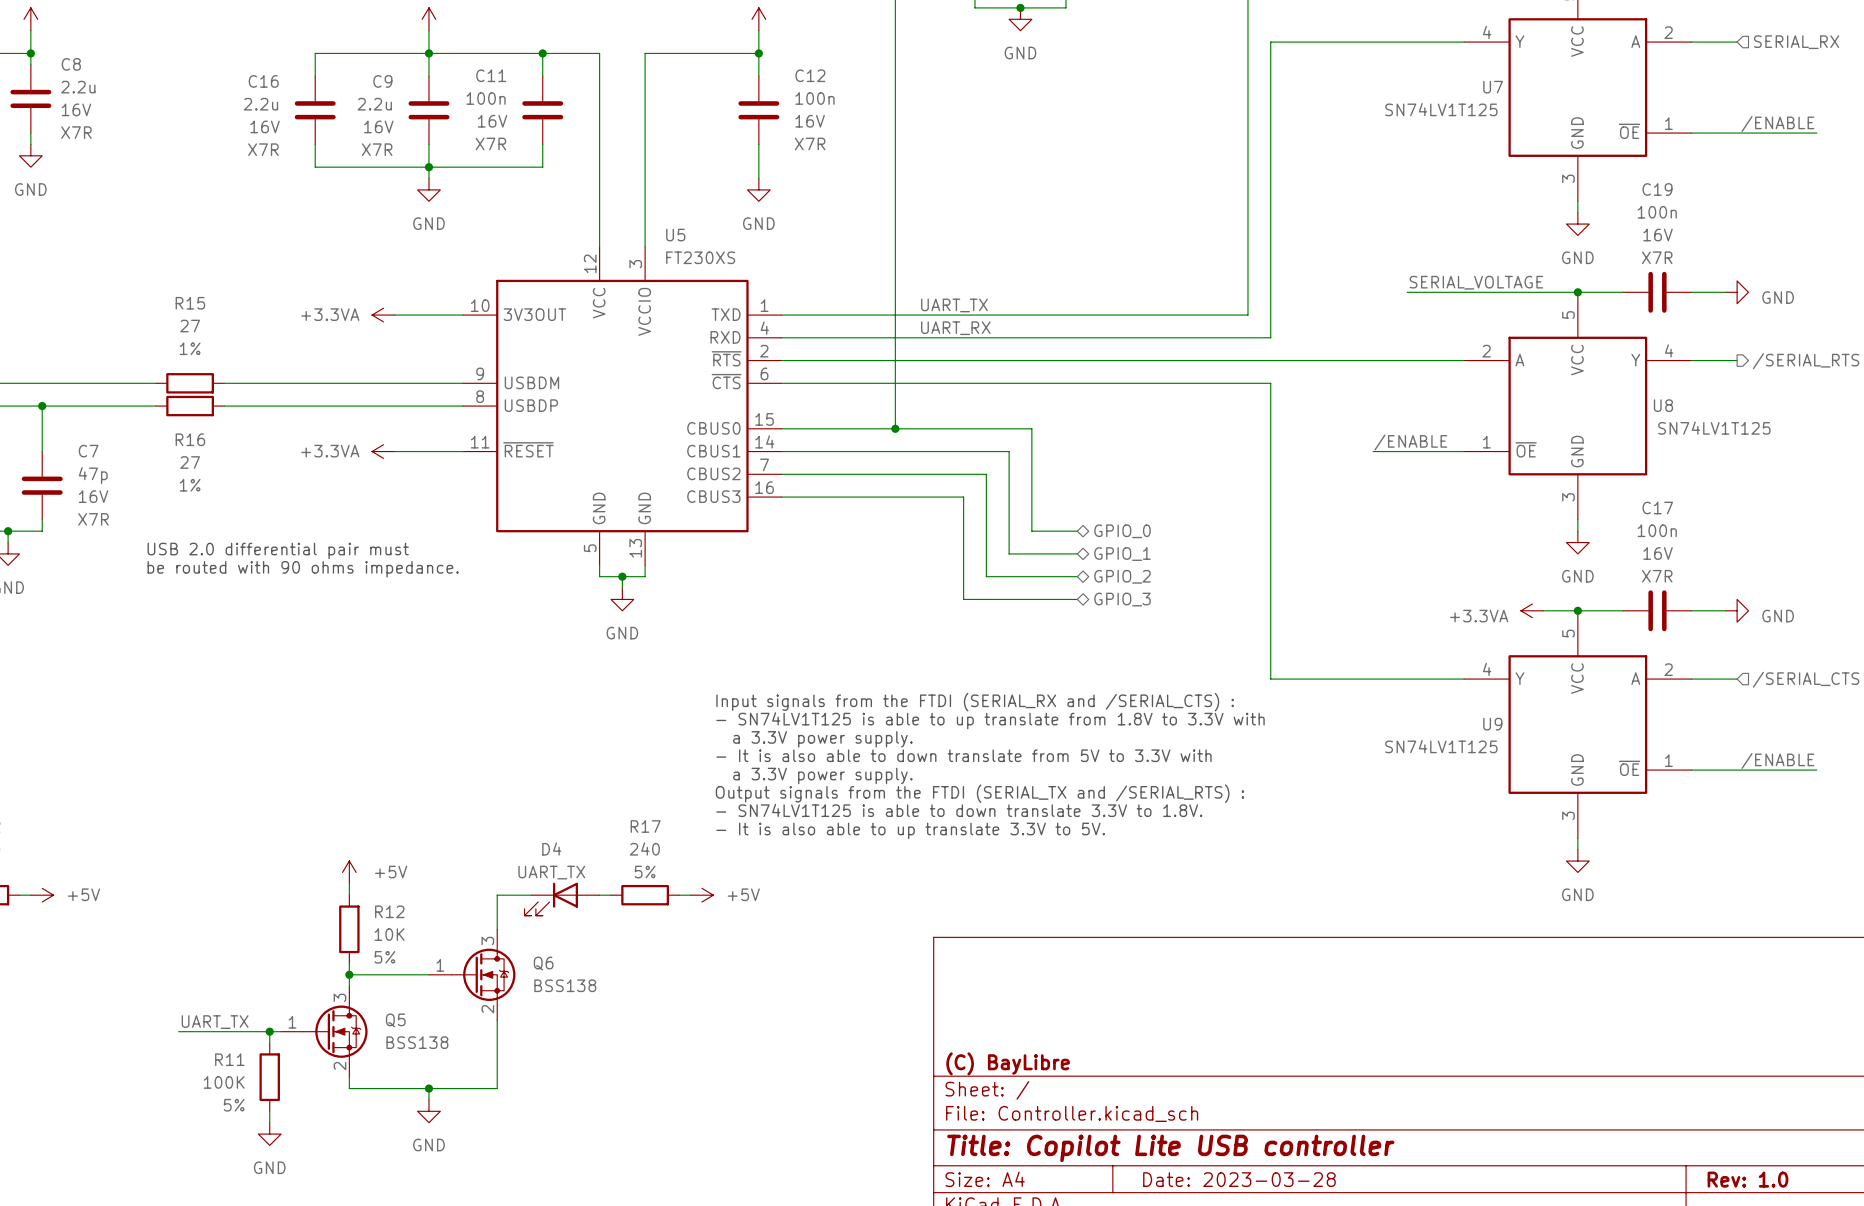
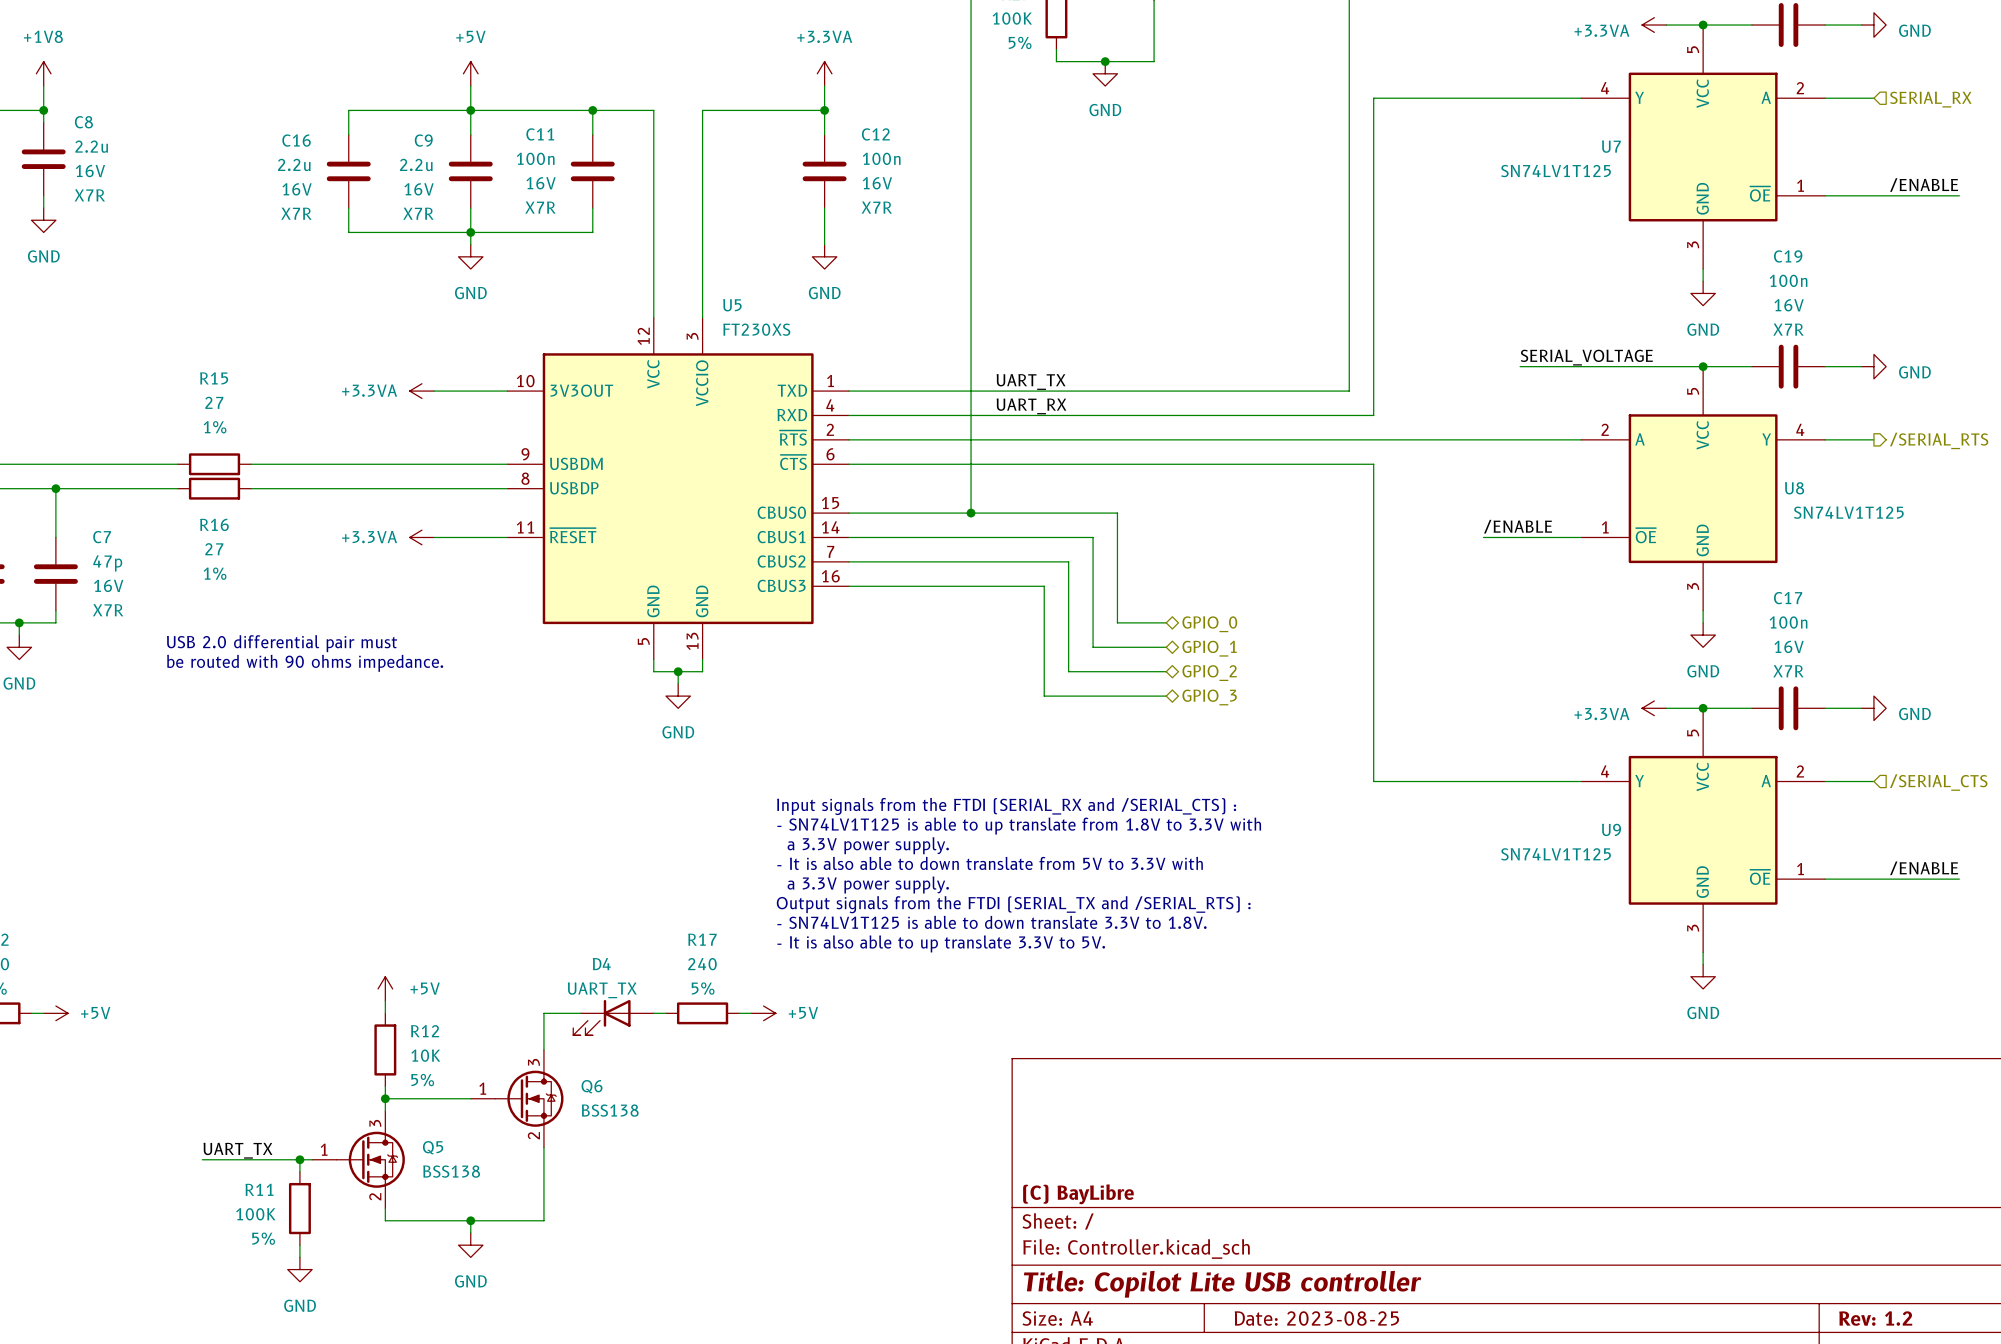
title block: Date: 2023-03-28 (1239, 1179) -> Date: 2023-08-25 (1316, 1318)
title block: Rev: 1.0 (1747, 1179) -> Rev: 1.2 (1875, 1318)

